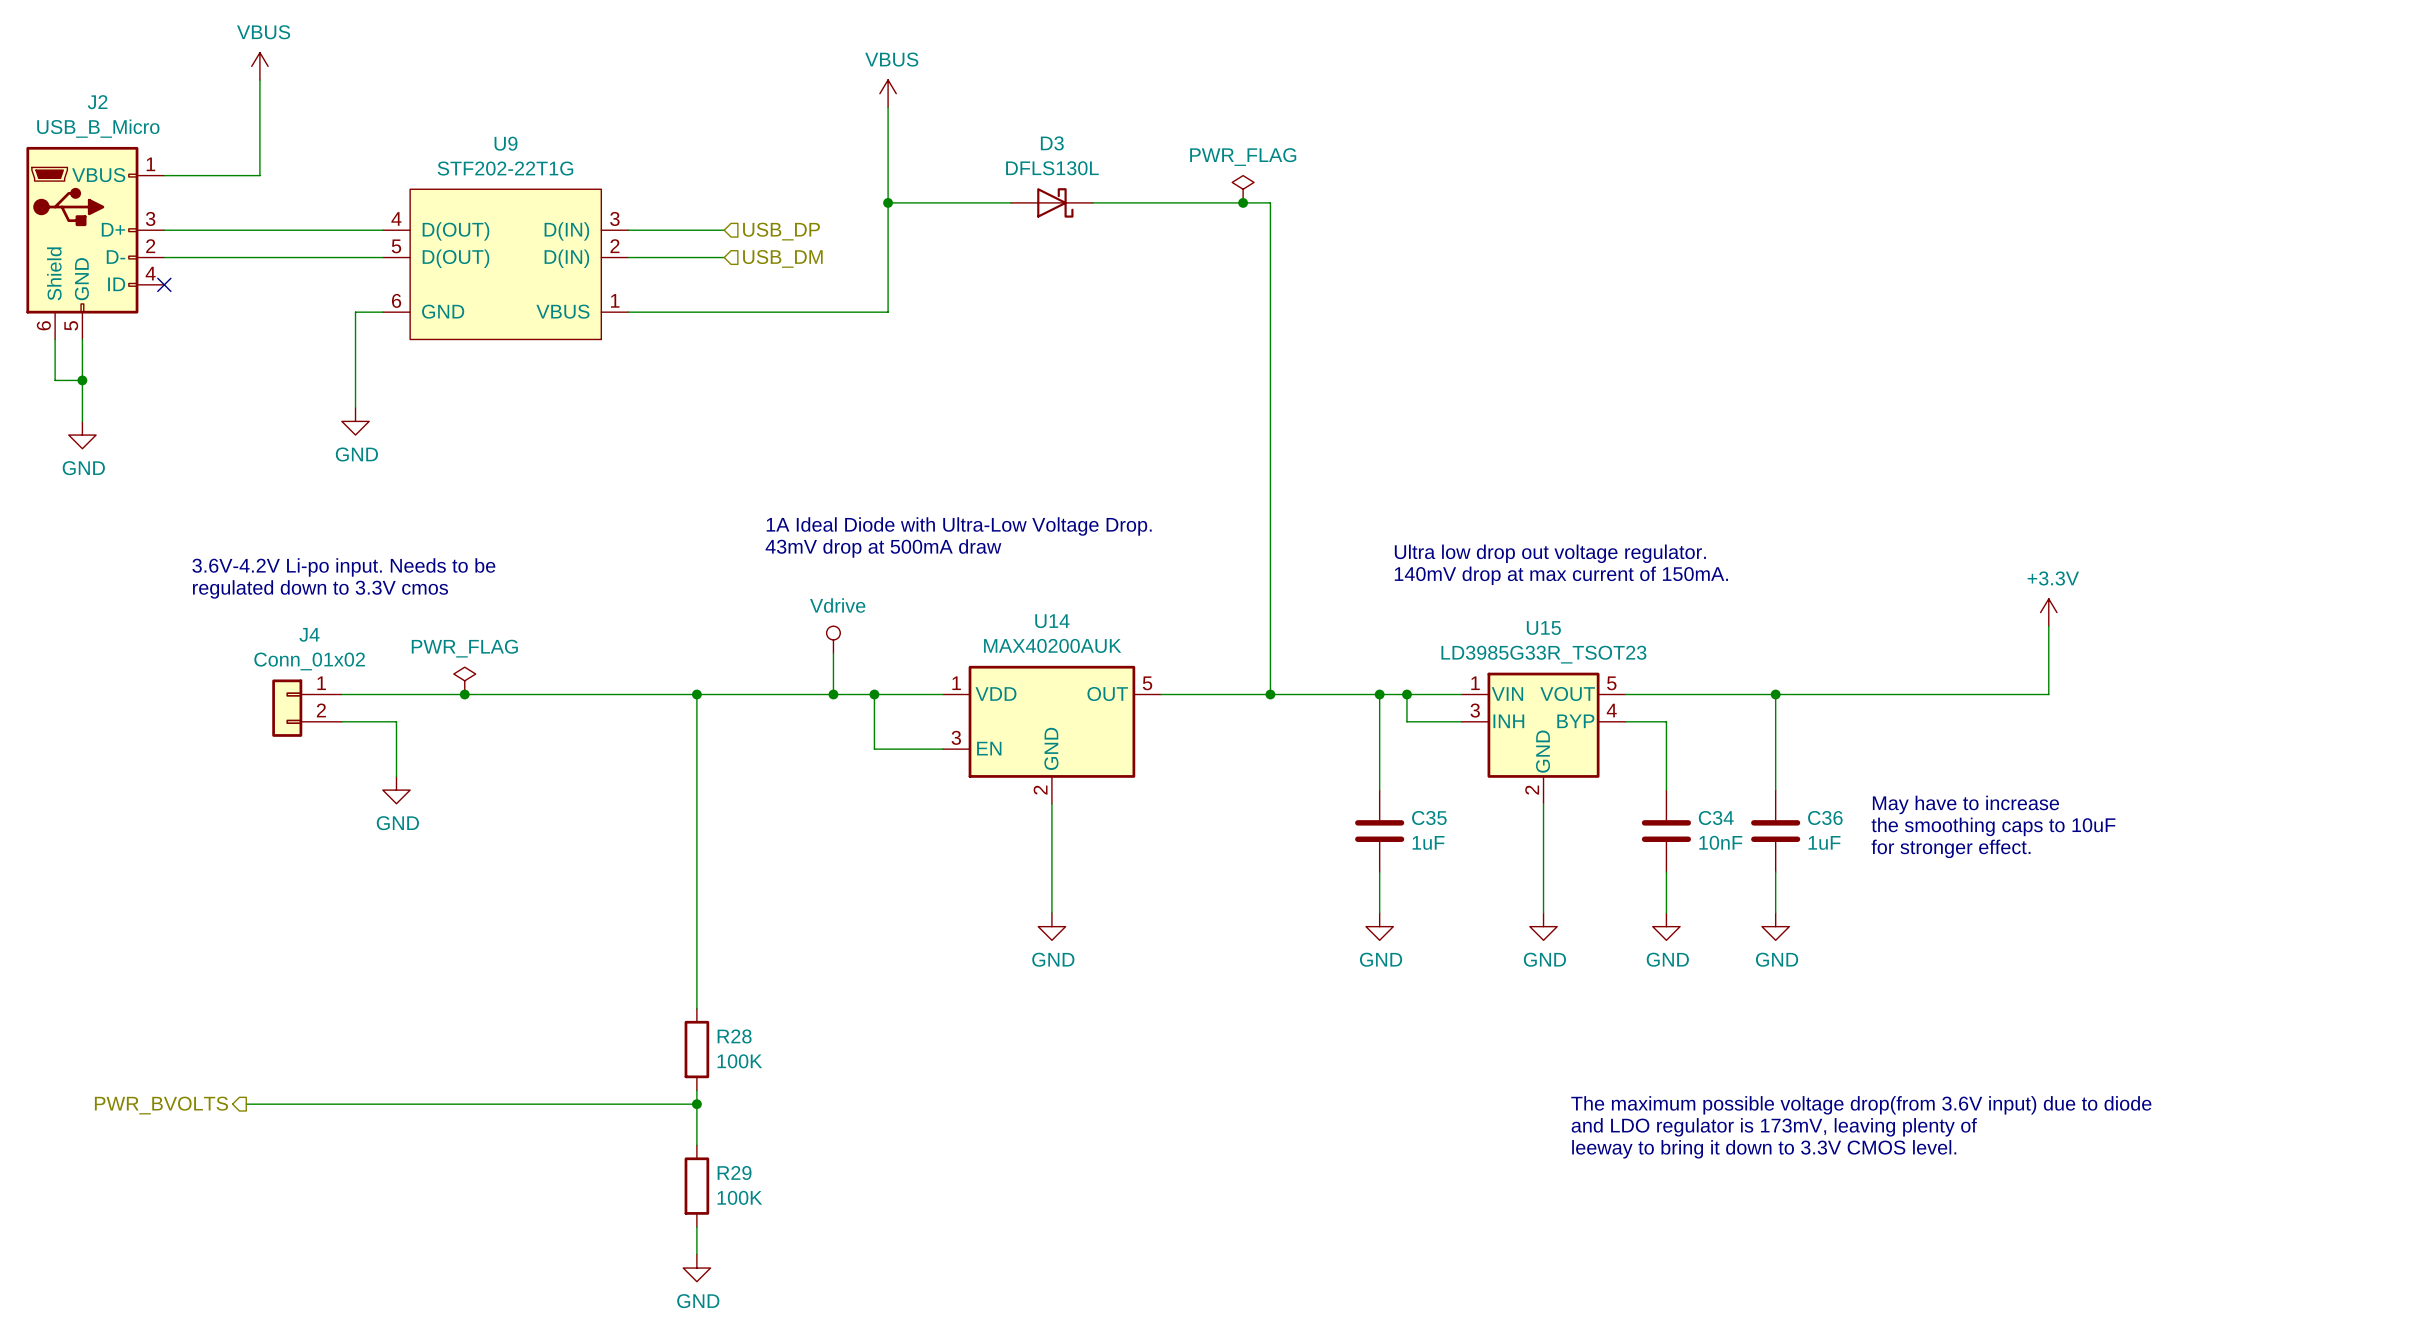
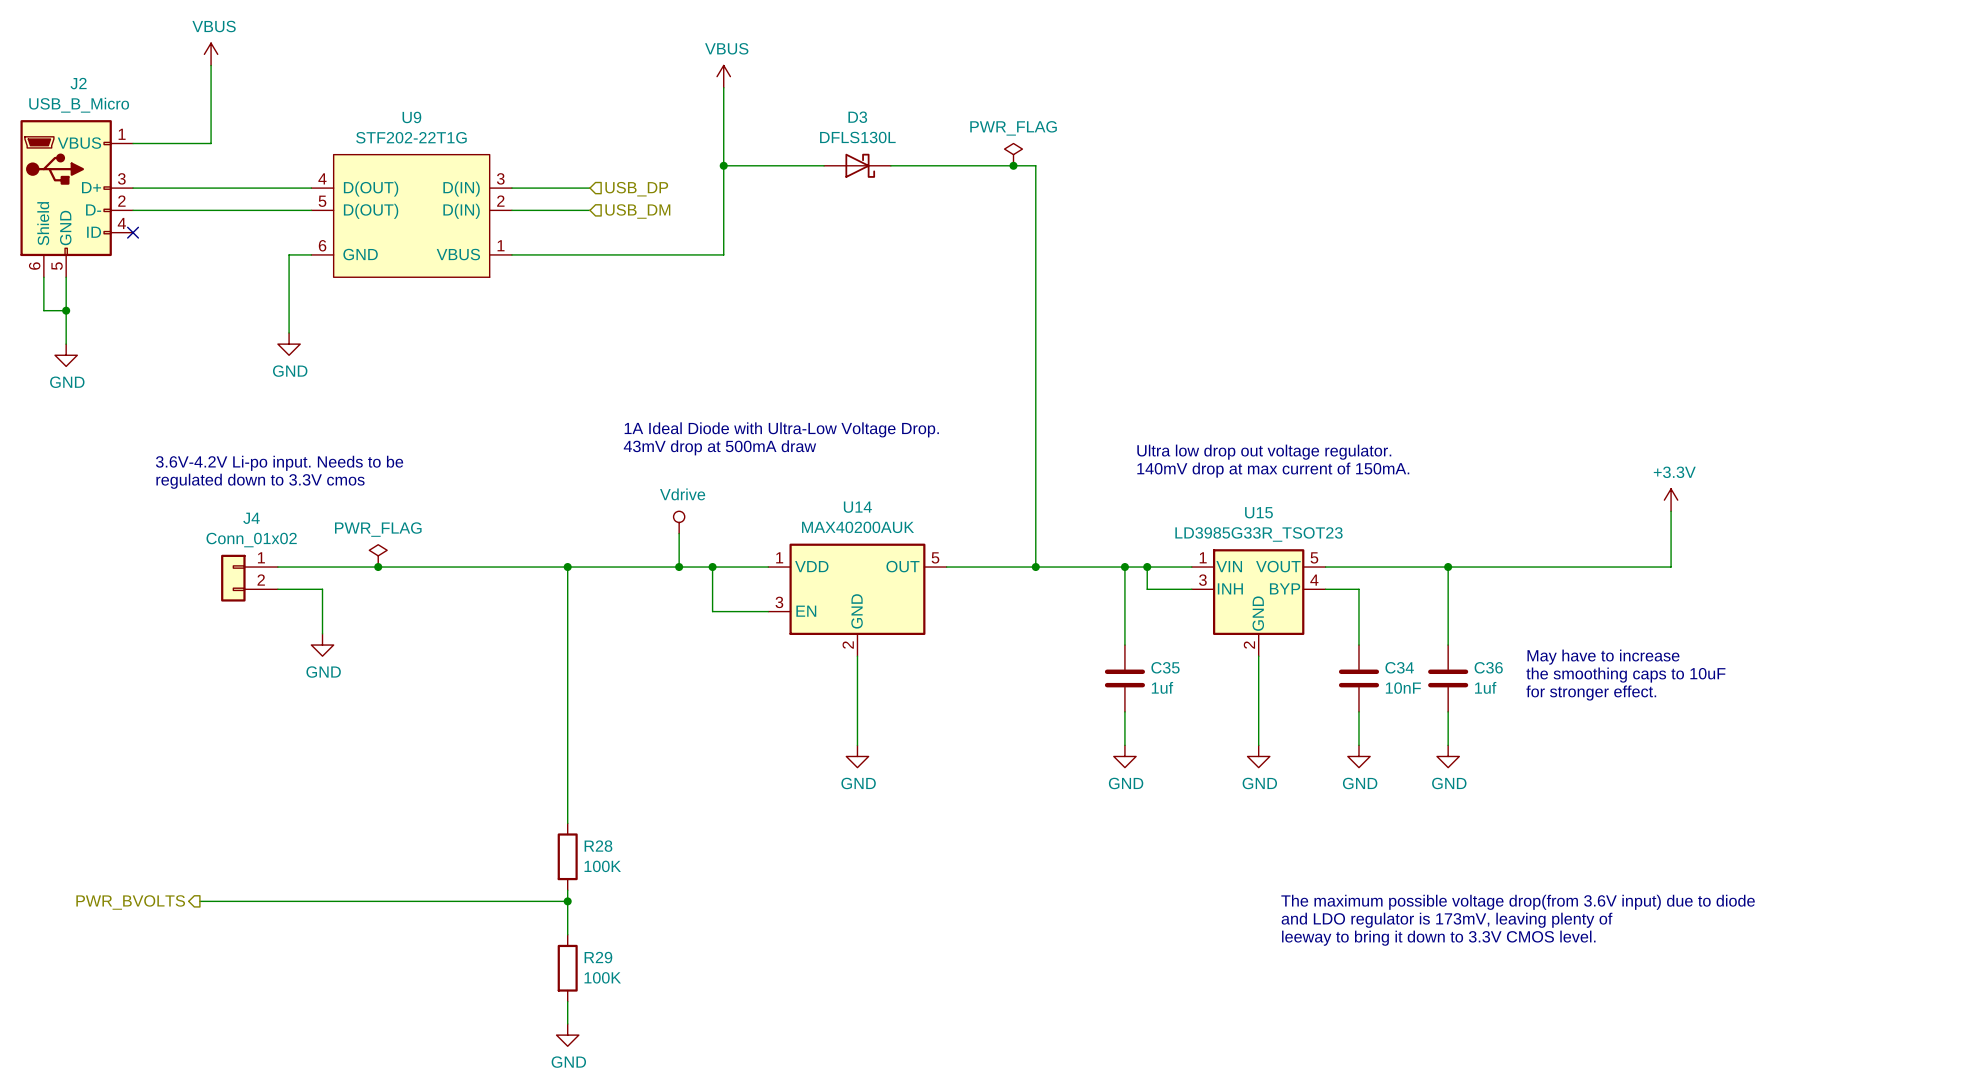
C35 value: 1uF (1428, 842) -> 1uf (1162, 687)
C36 value: 1uF (1824, 842) -> 1uf (1485, 687)

